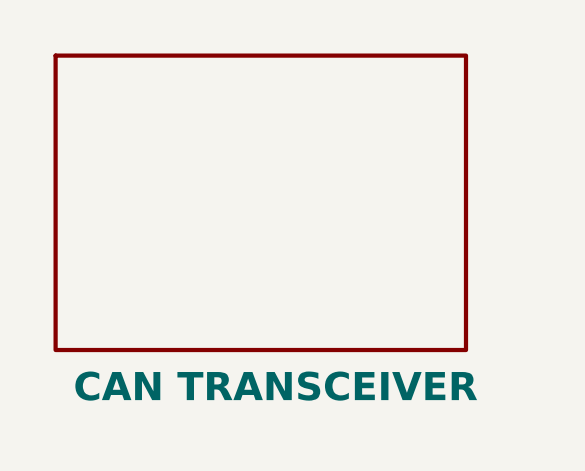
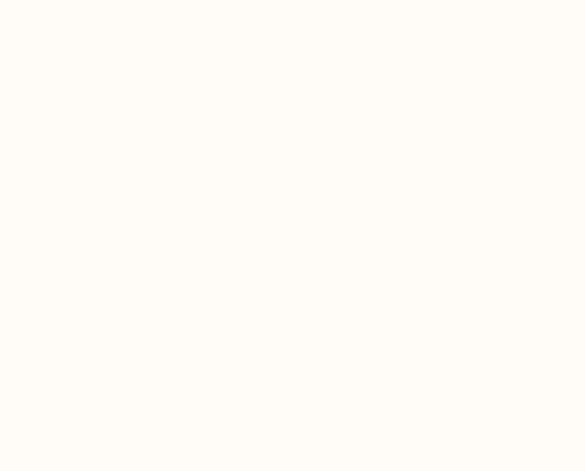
sheet CAN TRANSCEIVER: (260, 202) -> none

